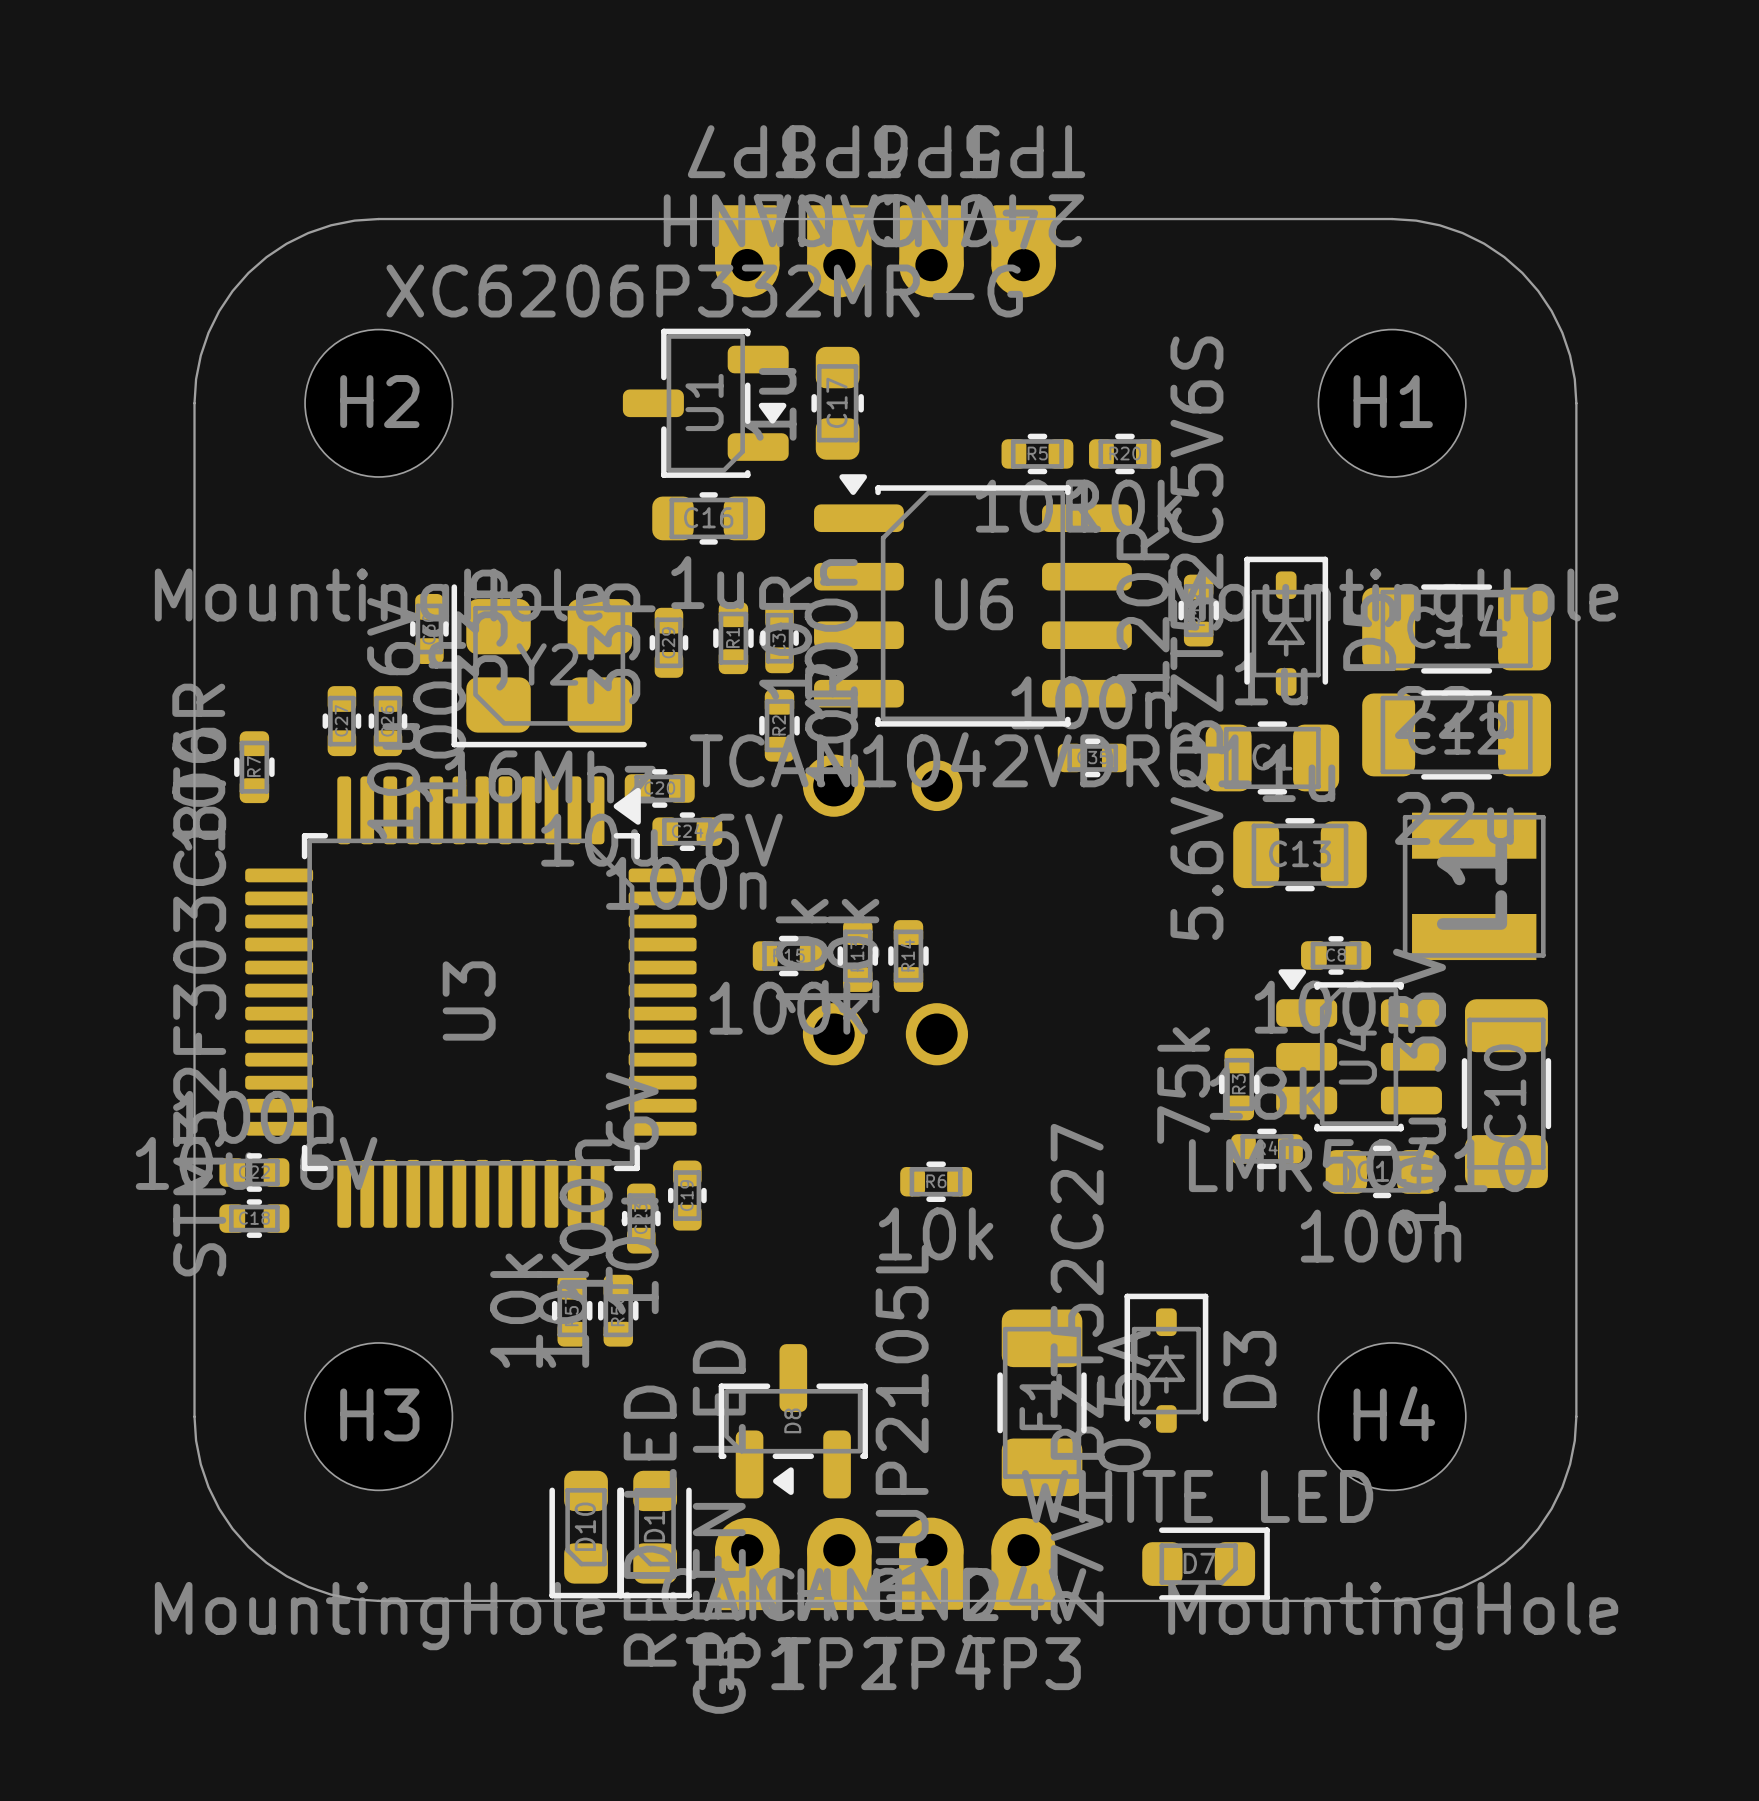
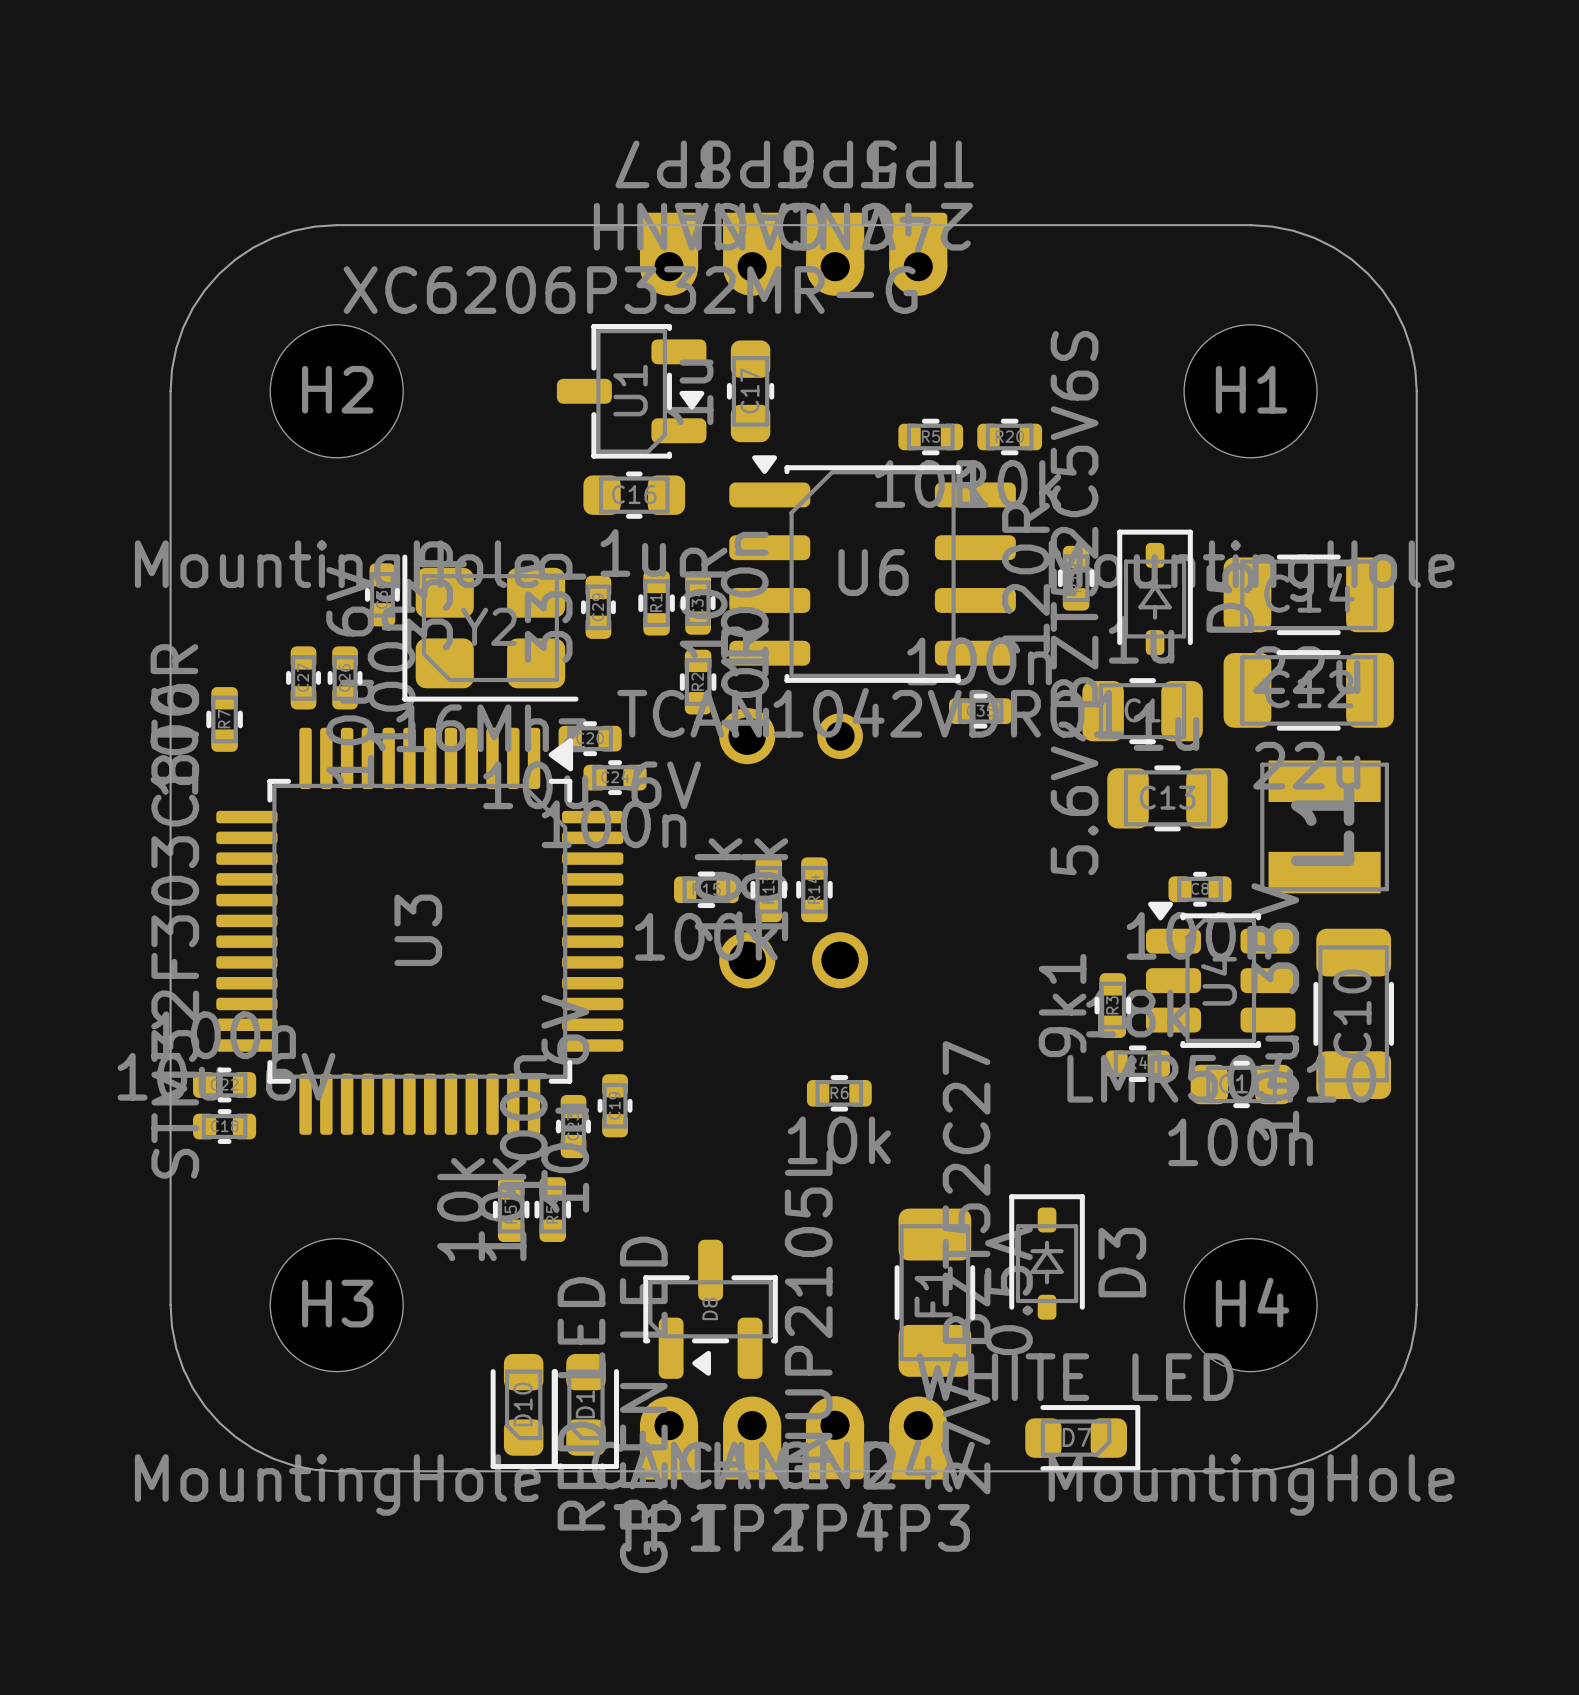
R3 value: 75k (1183, 1085) -> 9k1 (1062, 1005)

